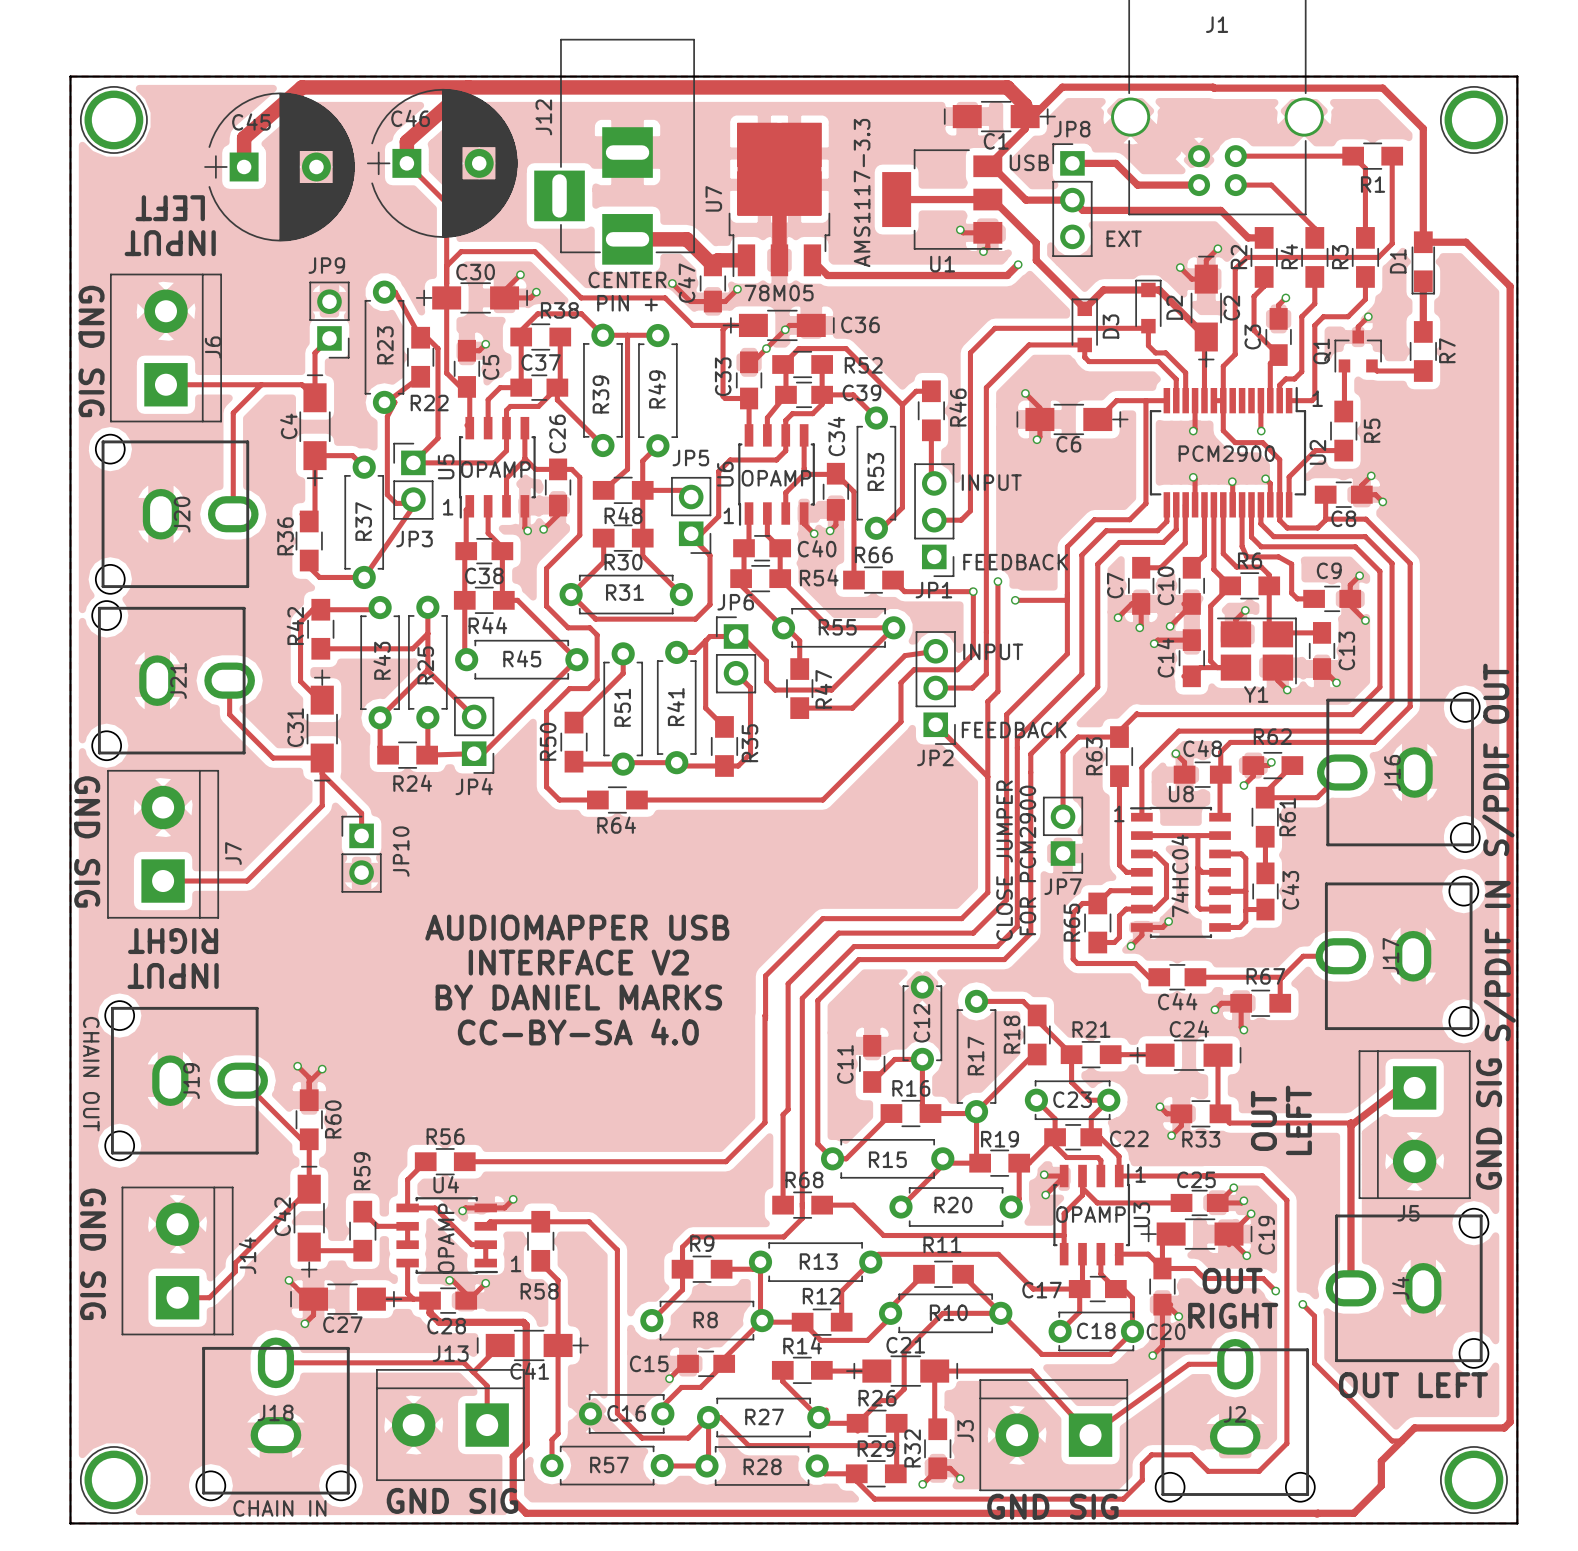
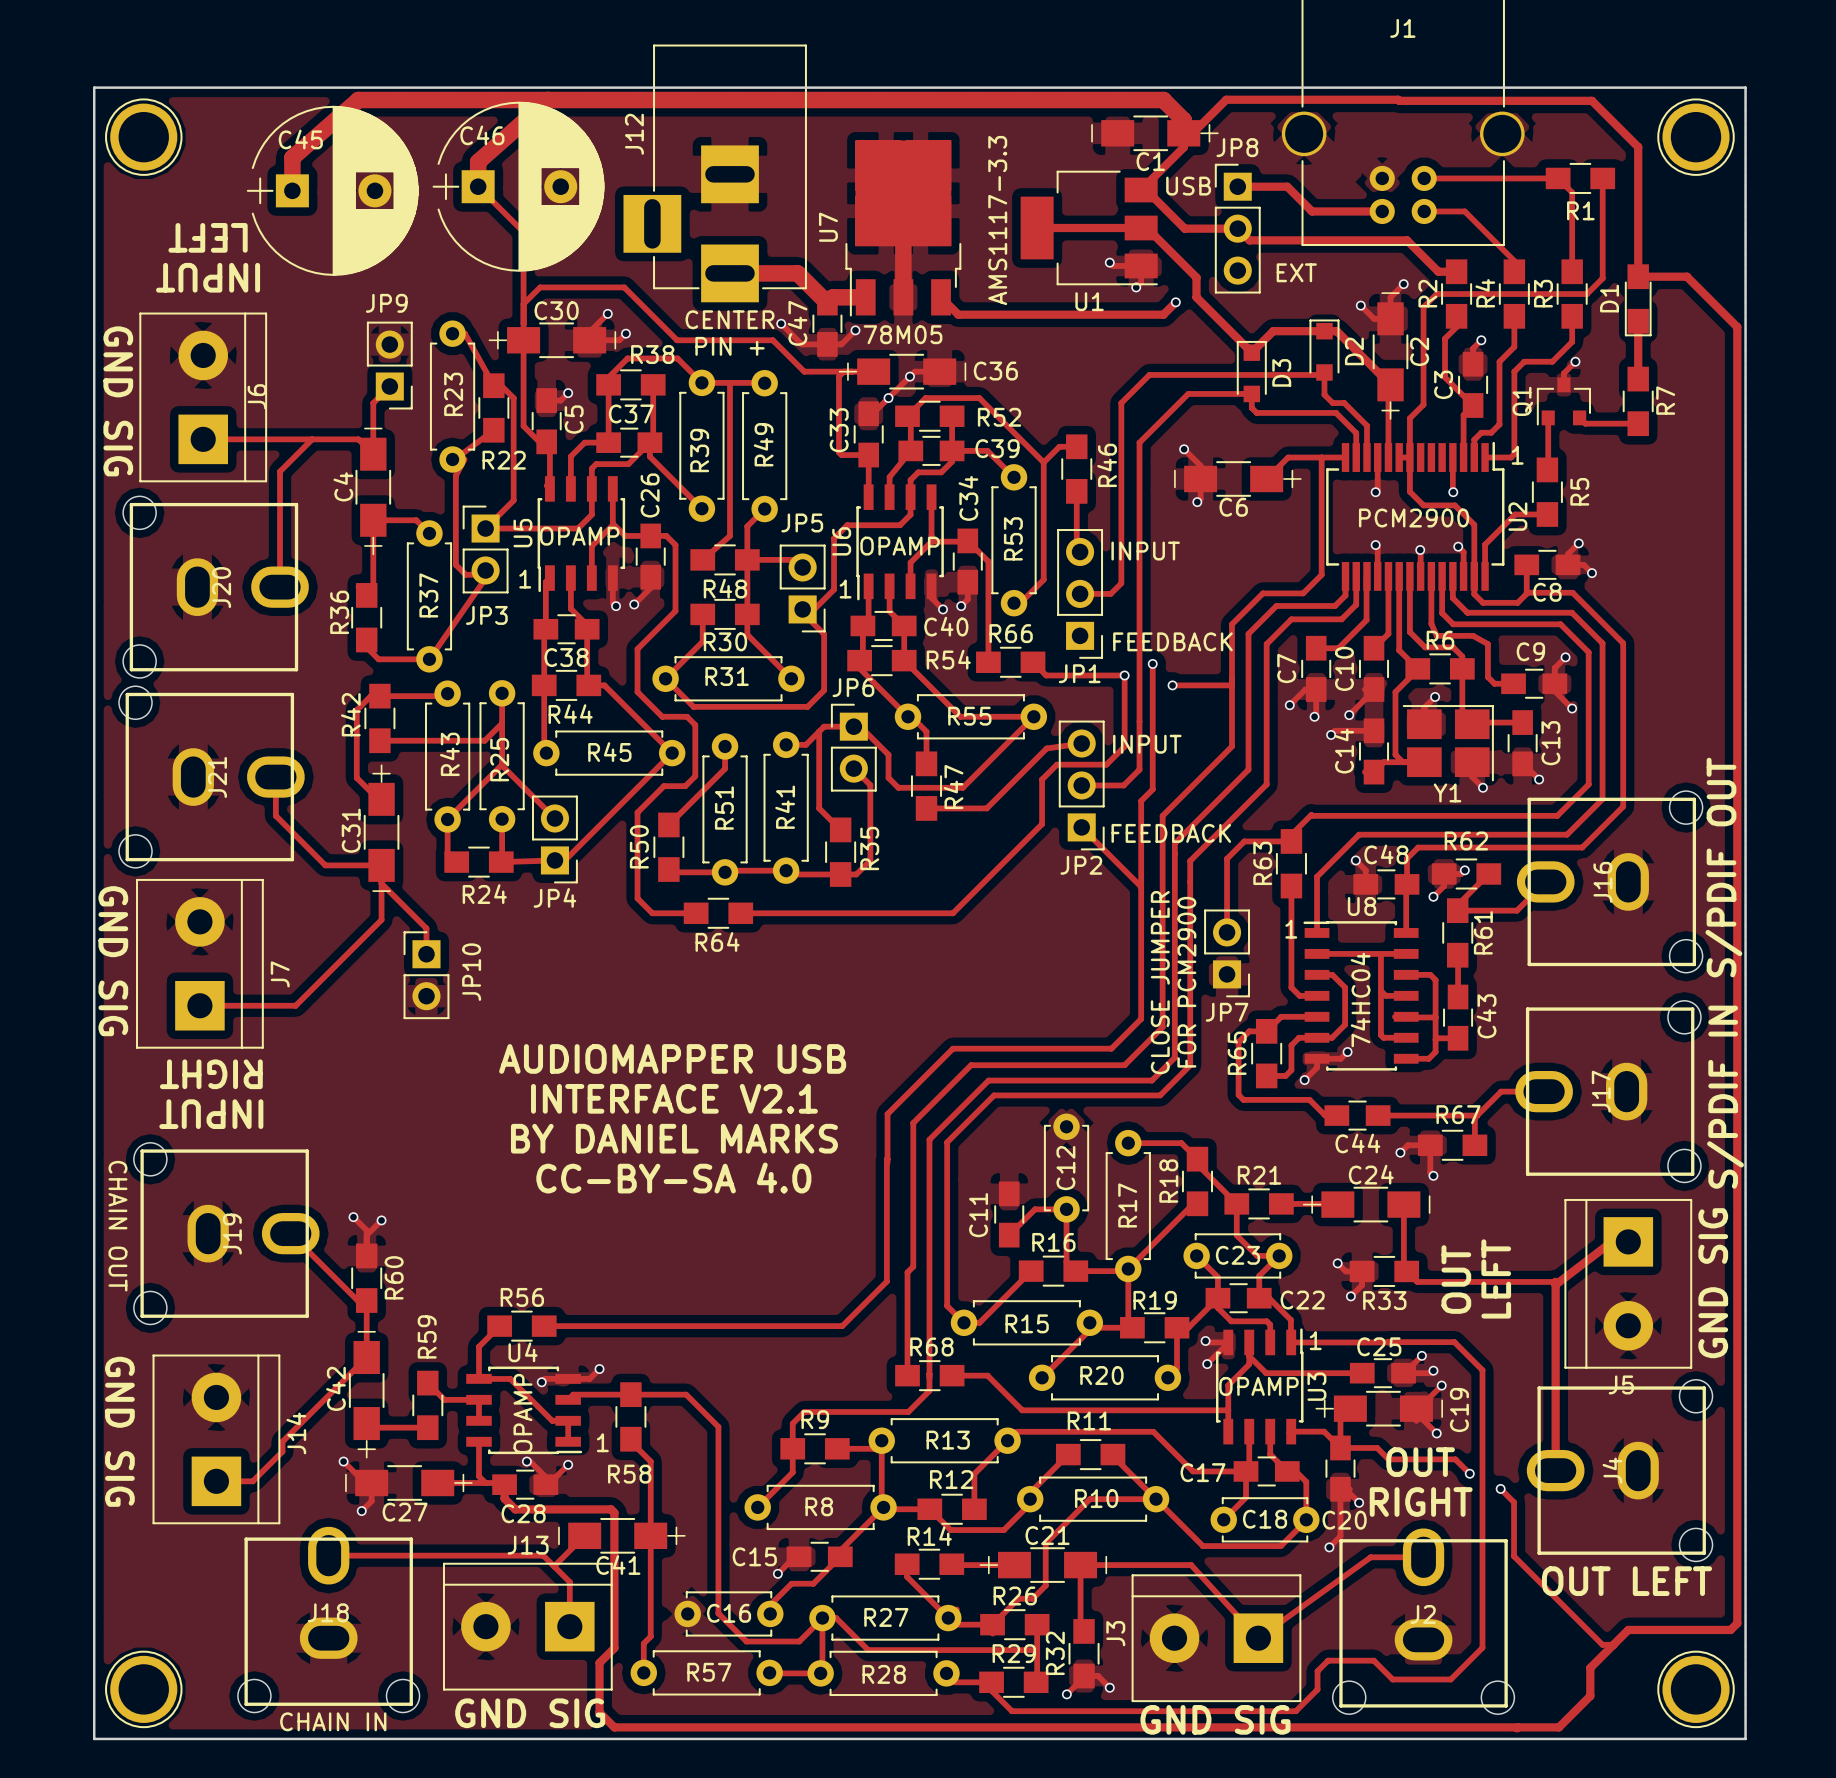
text: INTERFACE V2 (578, 962) -> INTERFACE V2.1 (674, 1098)

